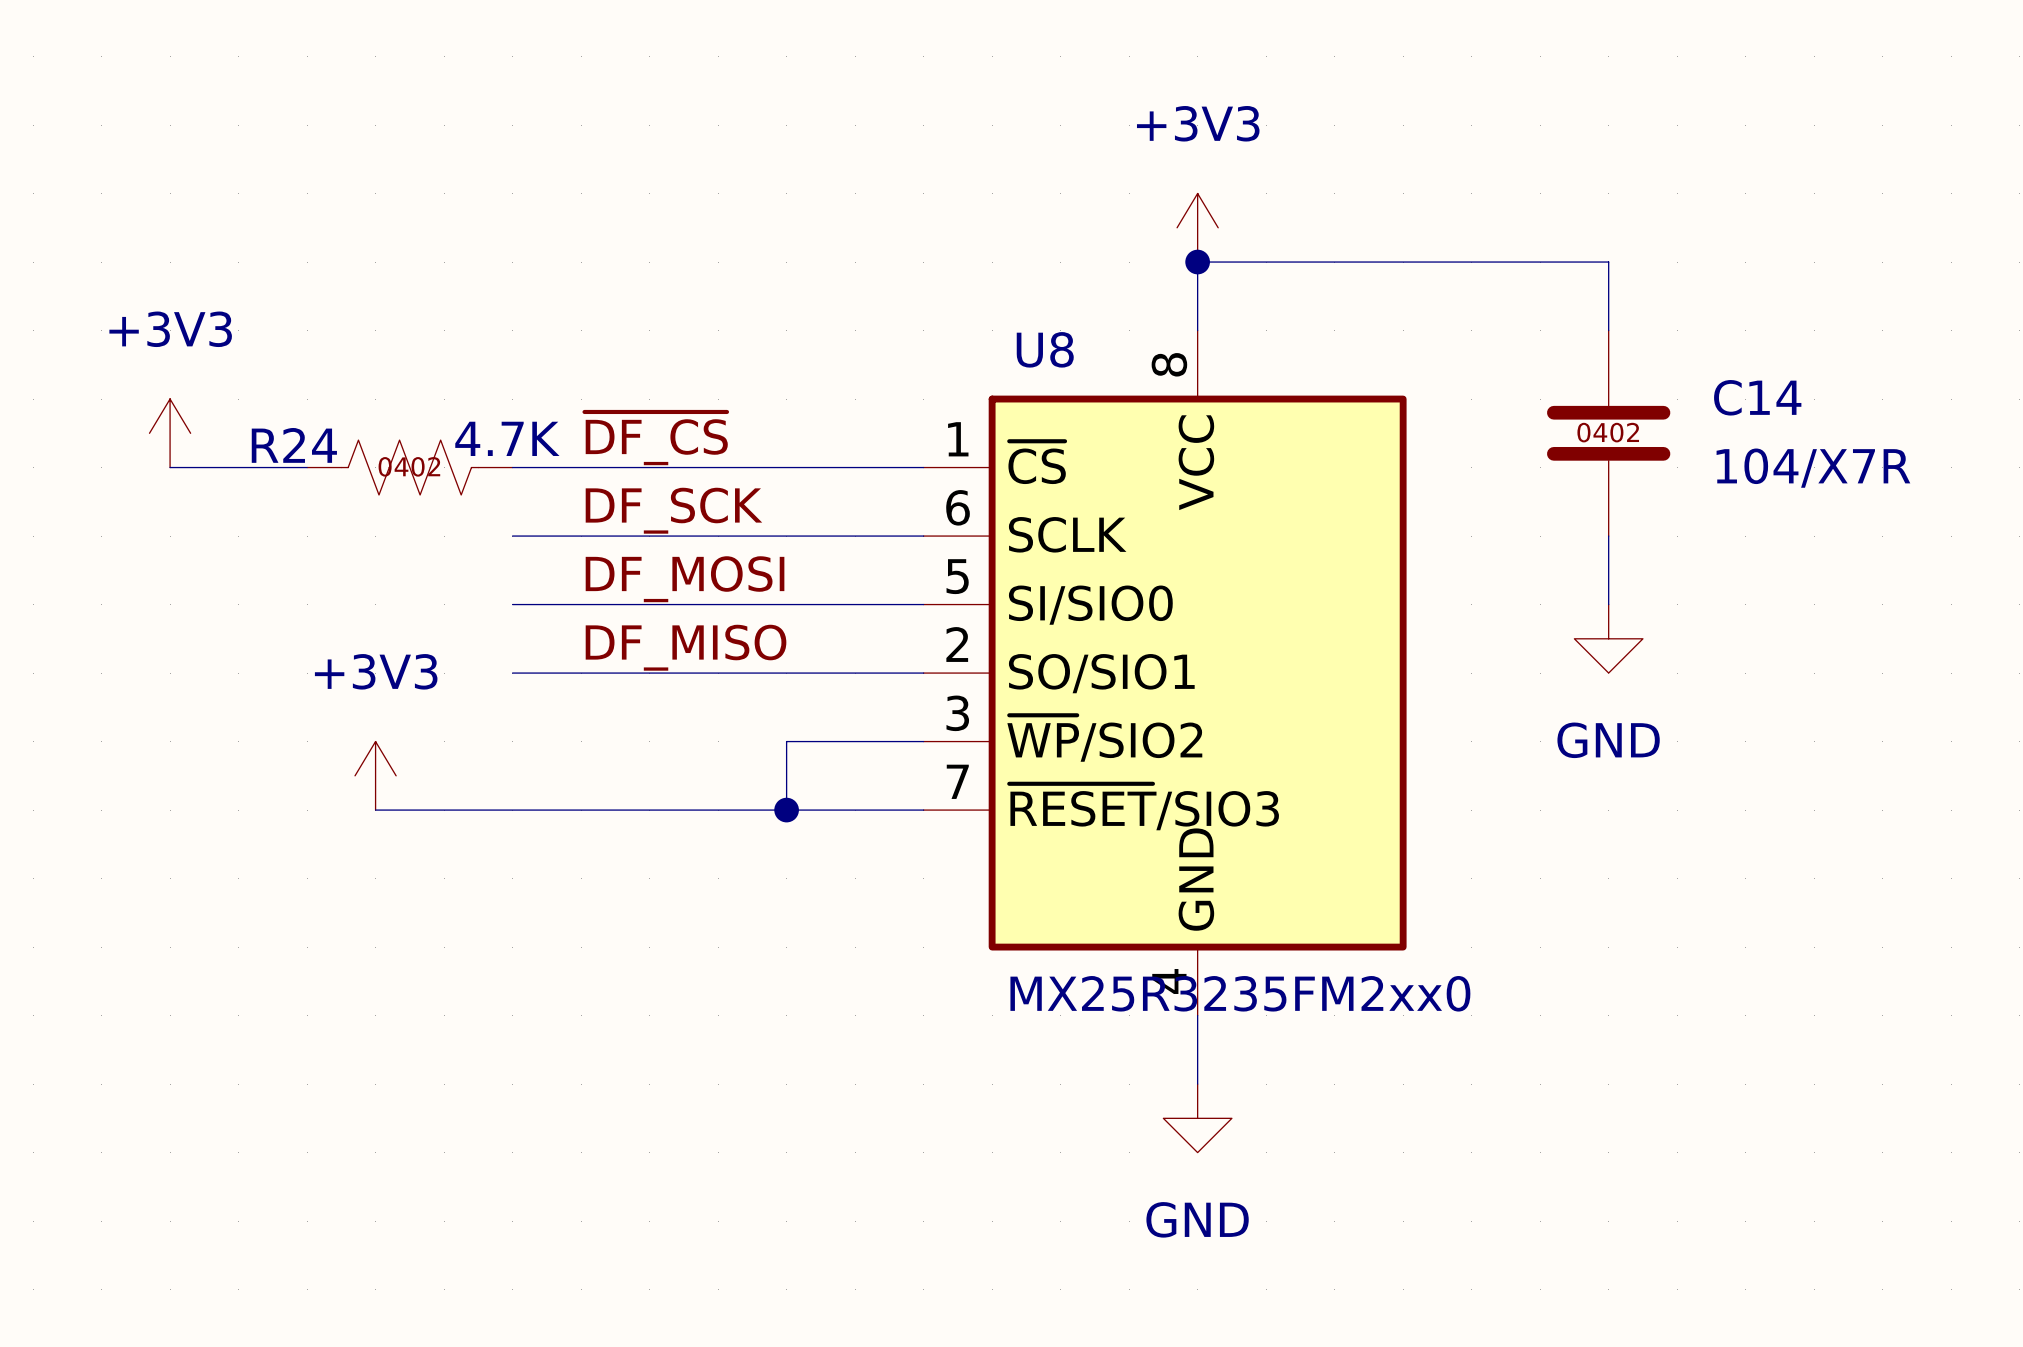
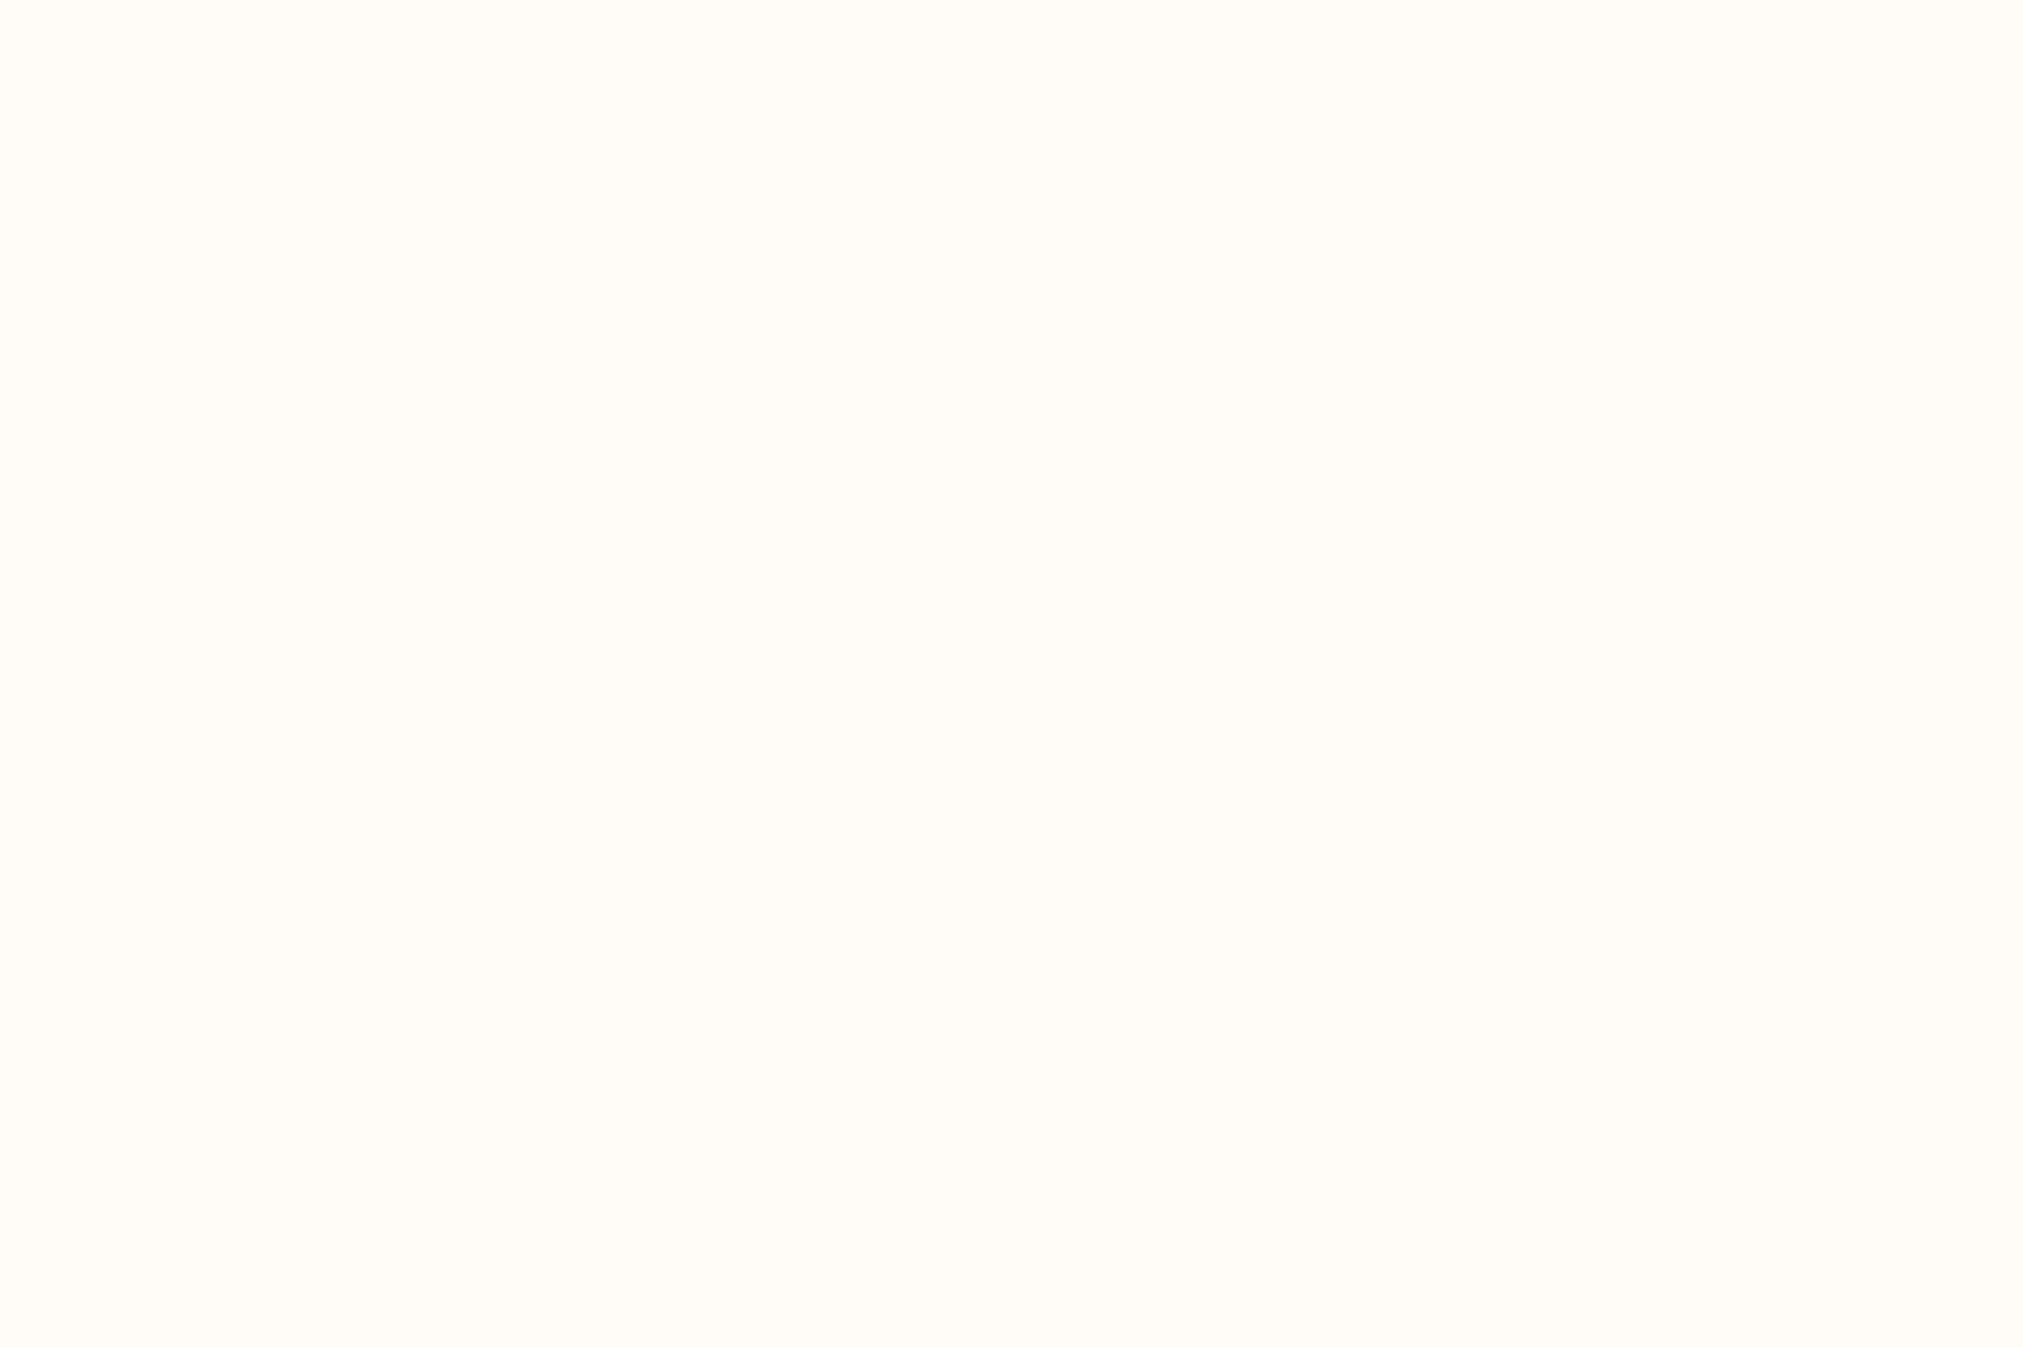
power symbol: +3V3 (1197, 227) -> none
junction: (1197, 262) -> none
wire: (1197, 330) (1197, 262) (1608, 262) (1608, 330) -> none
power symbol: +3V3 (170, 433) -> none
C14: 104/X7R (1608, 433) -> none
label: ~{DF_CS} (656, 438) -> none
wire: (170, 467) (307, 467) -> none
R24: 4.7K (409, 467) -> none
wire: (512, 467) (923, 467) -> none
label: DF_SCK (673, 510) -> none
wire: (512, 536) (923, 536) -> none
wire: (1608, 536) (1608, 604) -> none
label: DF_MOSI (685, 579) -> none
wire: (512, 604) (923, 604) -> none
power symbol: GND (1608, 638) -> none
label: DF_MISO (686, 647) -> none
wire: (512, 673) (923, 673) -> none
U8: MX25R3235FM2xx0 (1165, 673) -> none
wire: (923, 741) (786, 741) (786, 810) -> none
power symbol: +3V3 (375, 775) -> none
wire: (375, 810) (923, 810) -> none
junction: (786, 810) -> none
wire: (1197, 1015) (1197, 1084) -> none
power symbol: GND (1197, 1118) -> none

